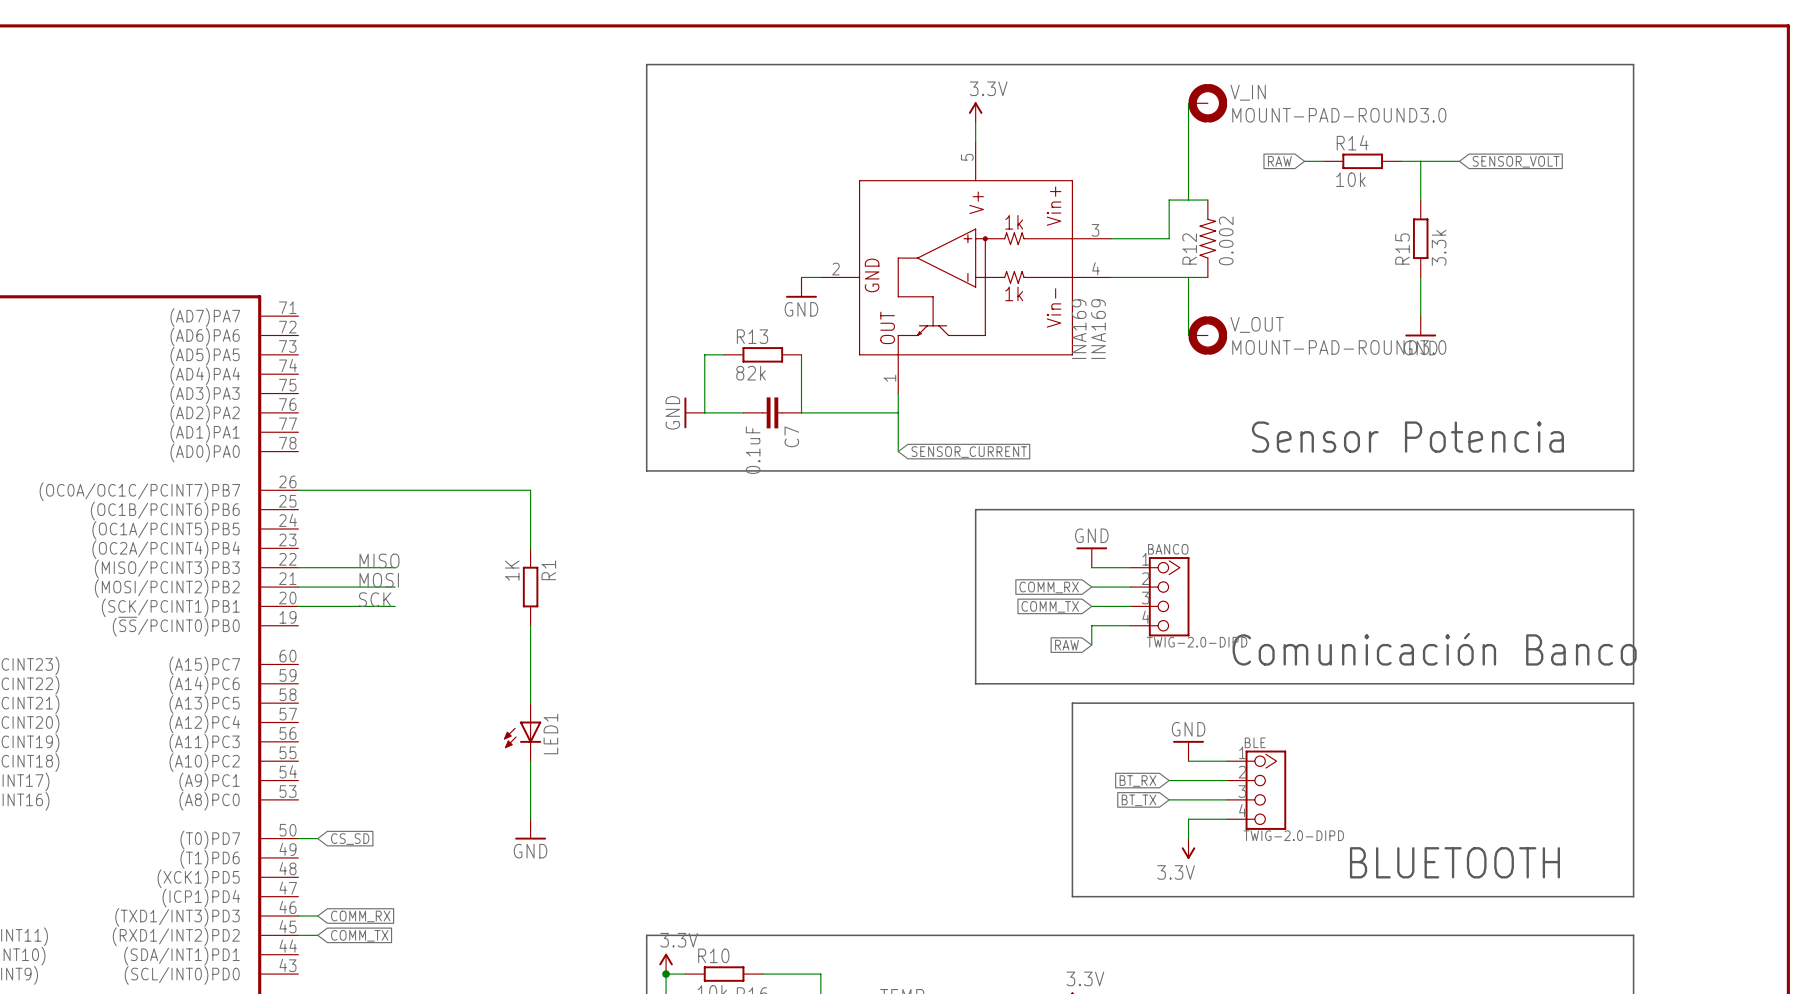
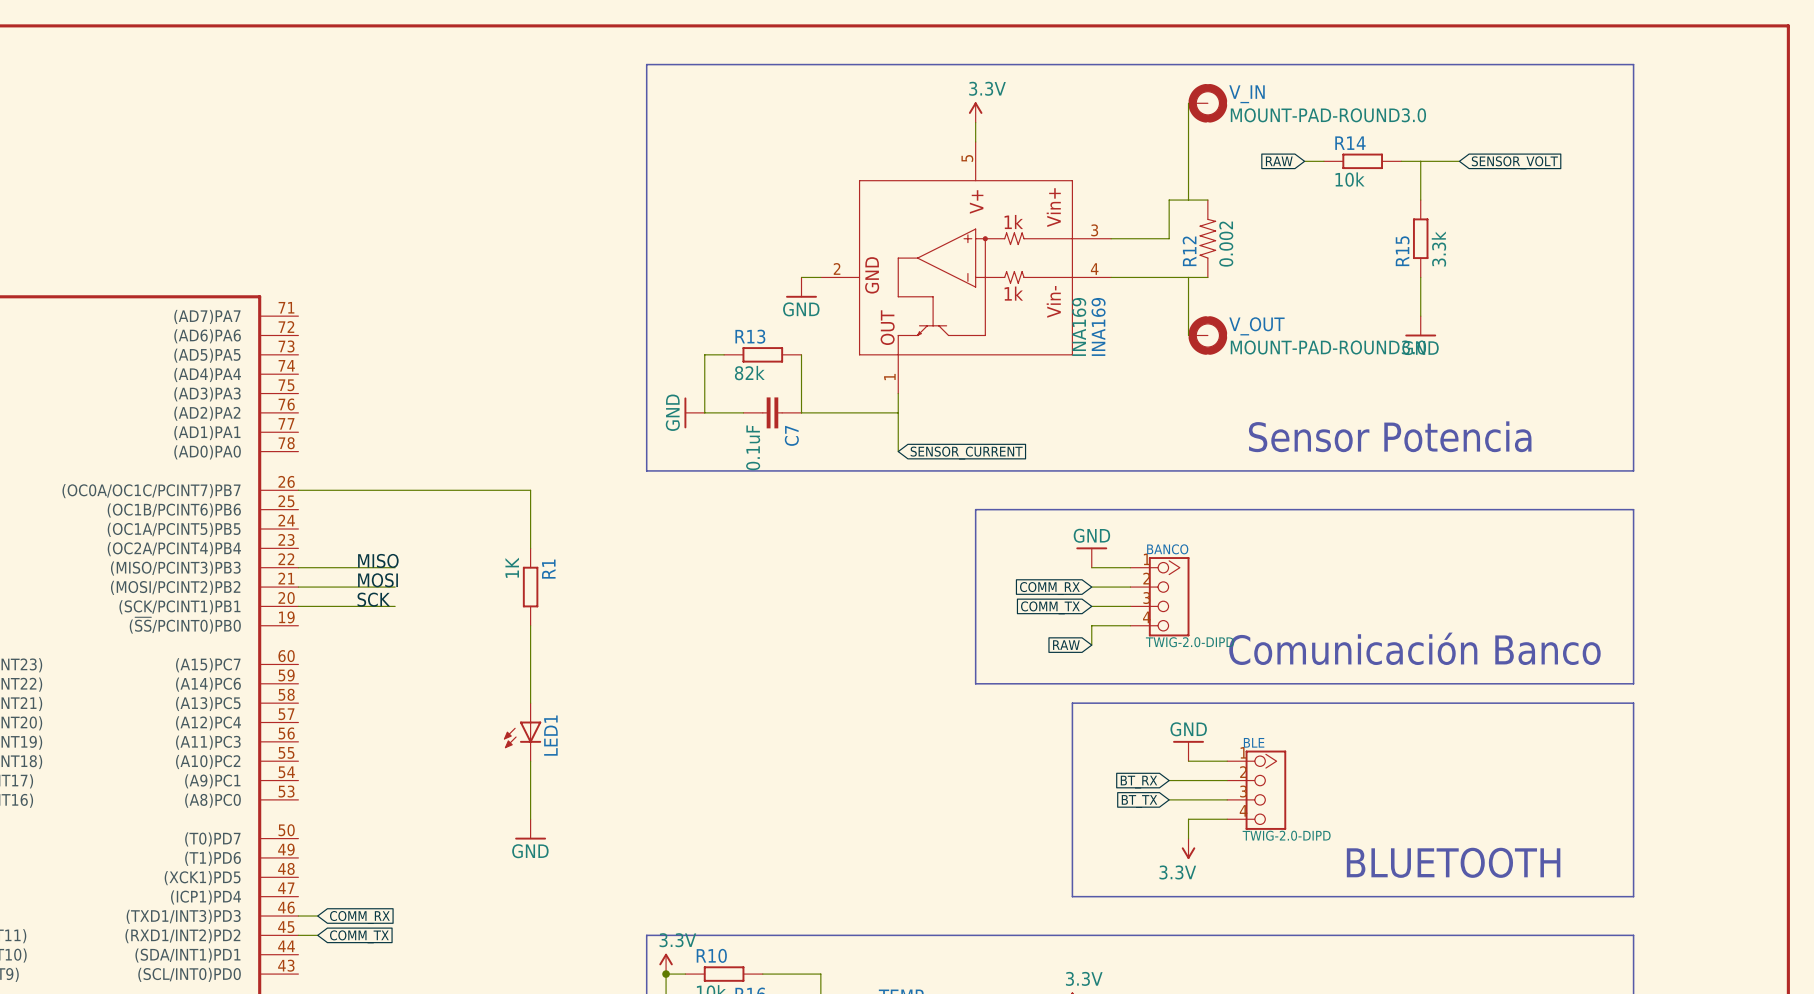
wire: (298, 838) (317, 838) -> none
global label: CS_SD (350, 839) -> none

